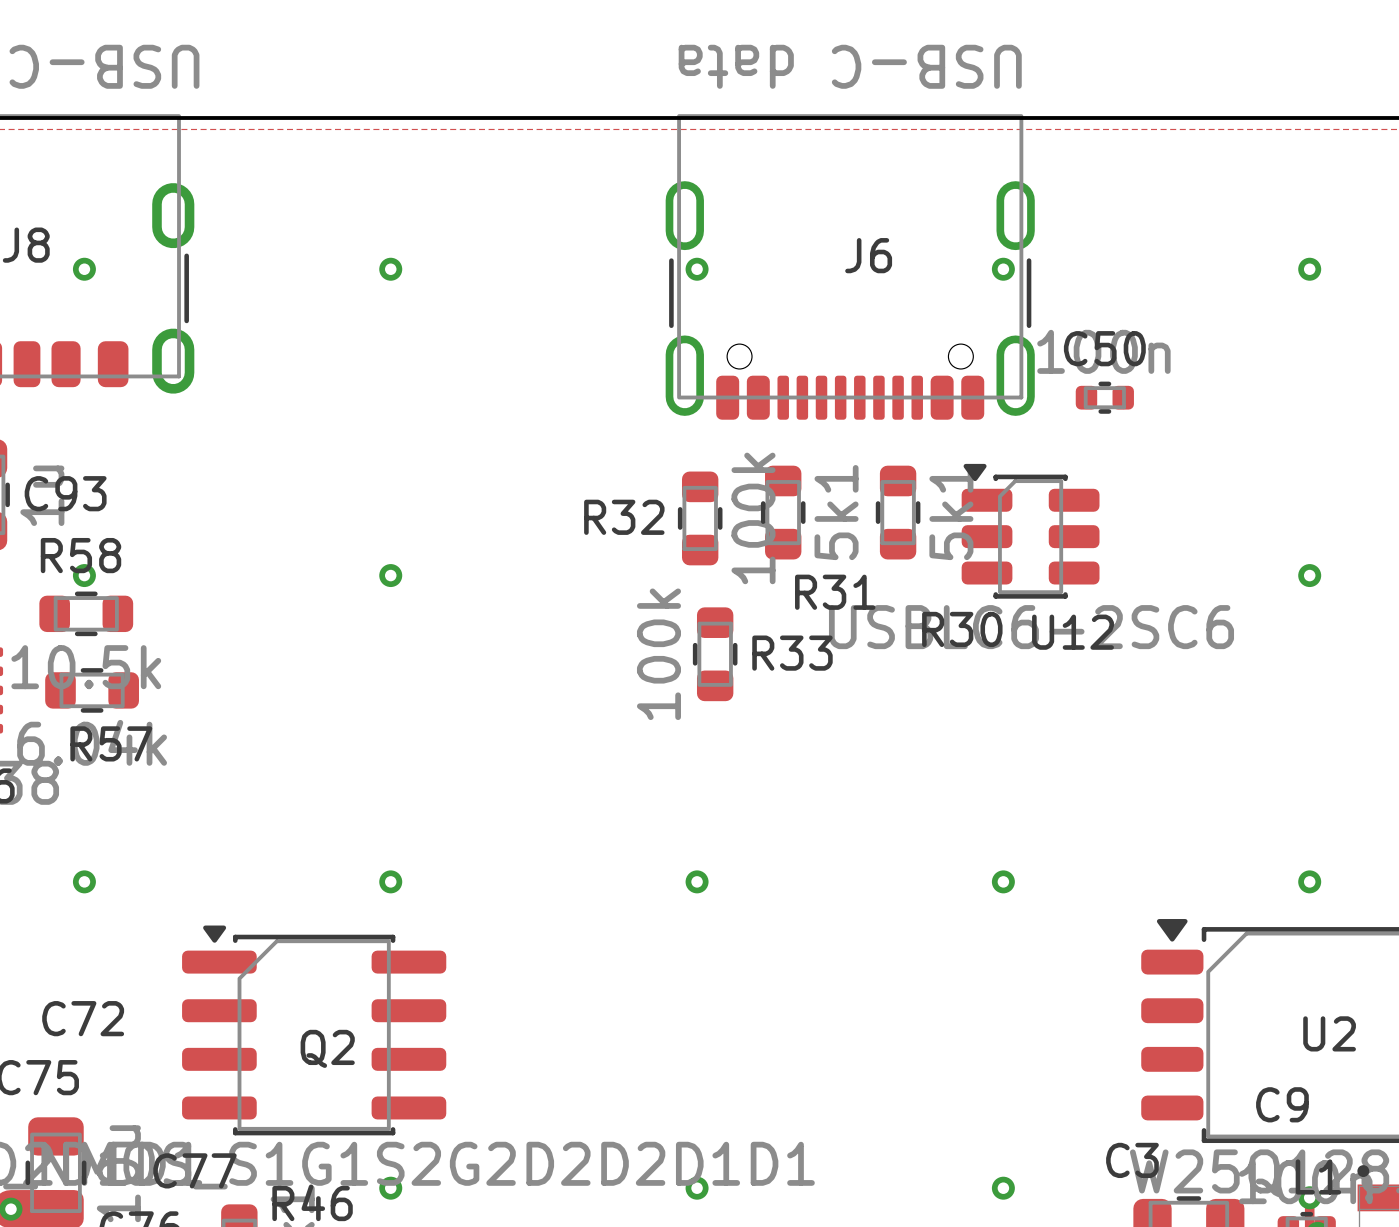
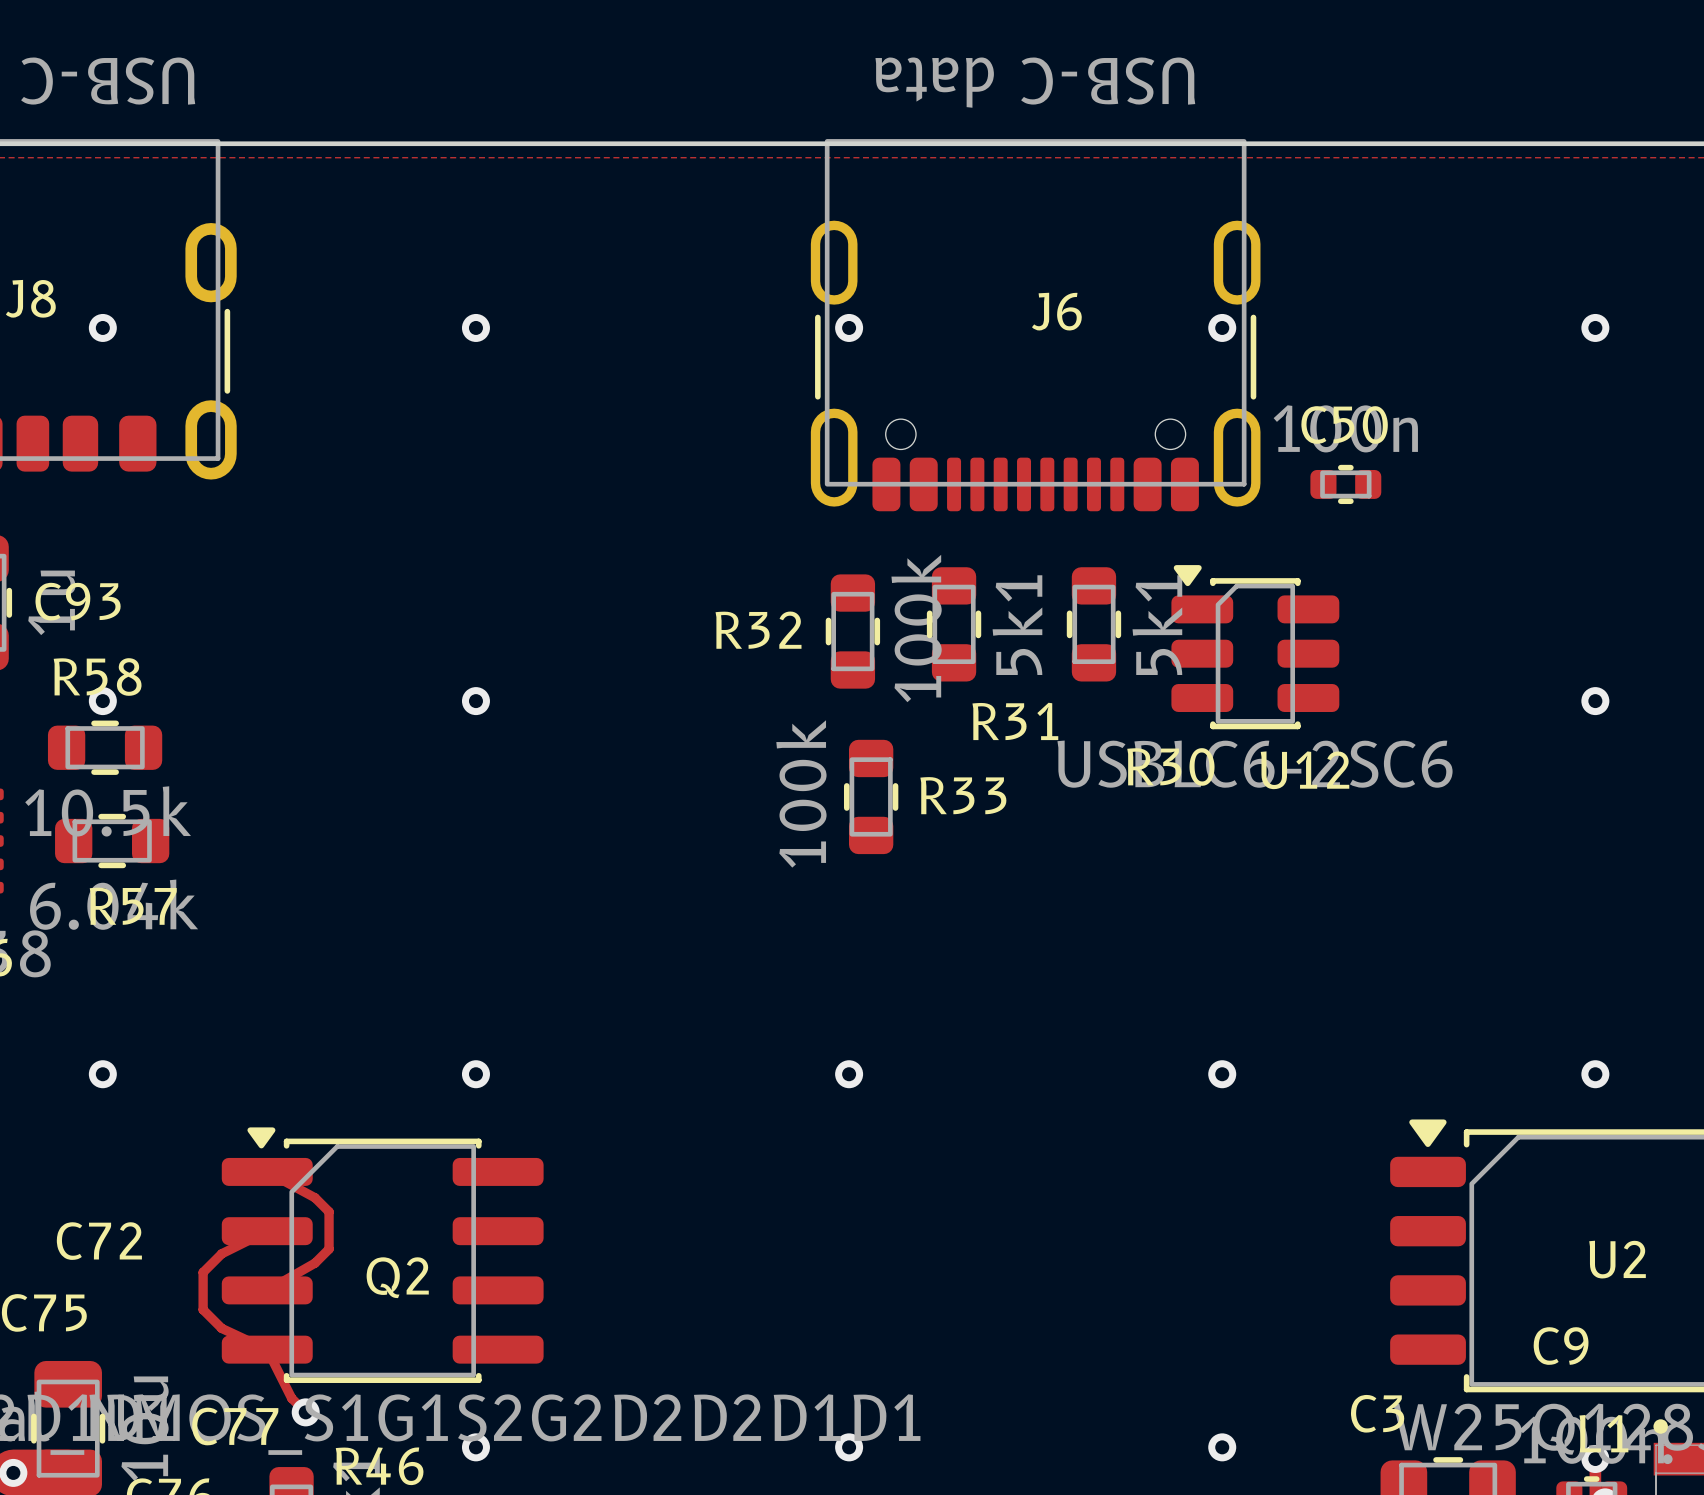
track: none -> (267, 1171) (315, 1197) (329, 1211) (329, 1249) (315, 1263) (267, 1290)
track: none -> (267, 1231) (221, 1253) (203, 1272) (203, 1309) (221, 1328) (267, 1349) (291, 1398) (305, 1412)
via: none -> (305, 1412)

